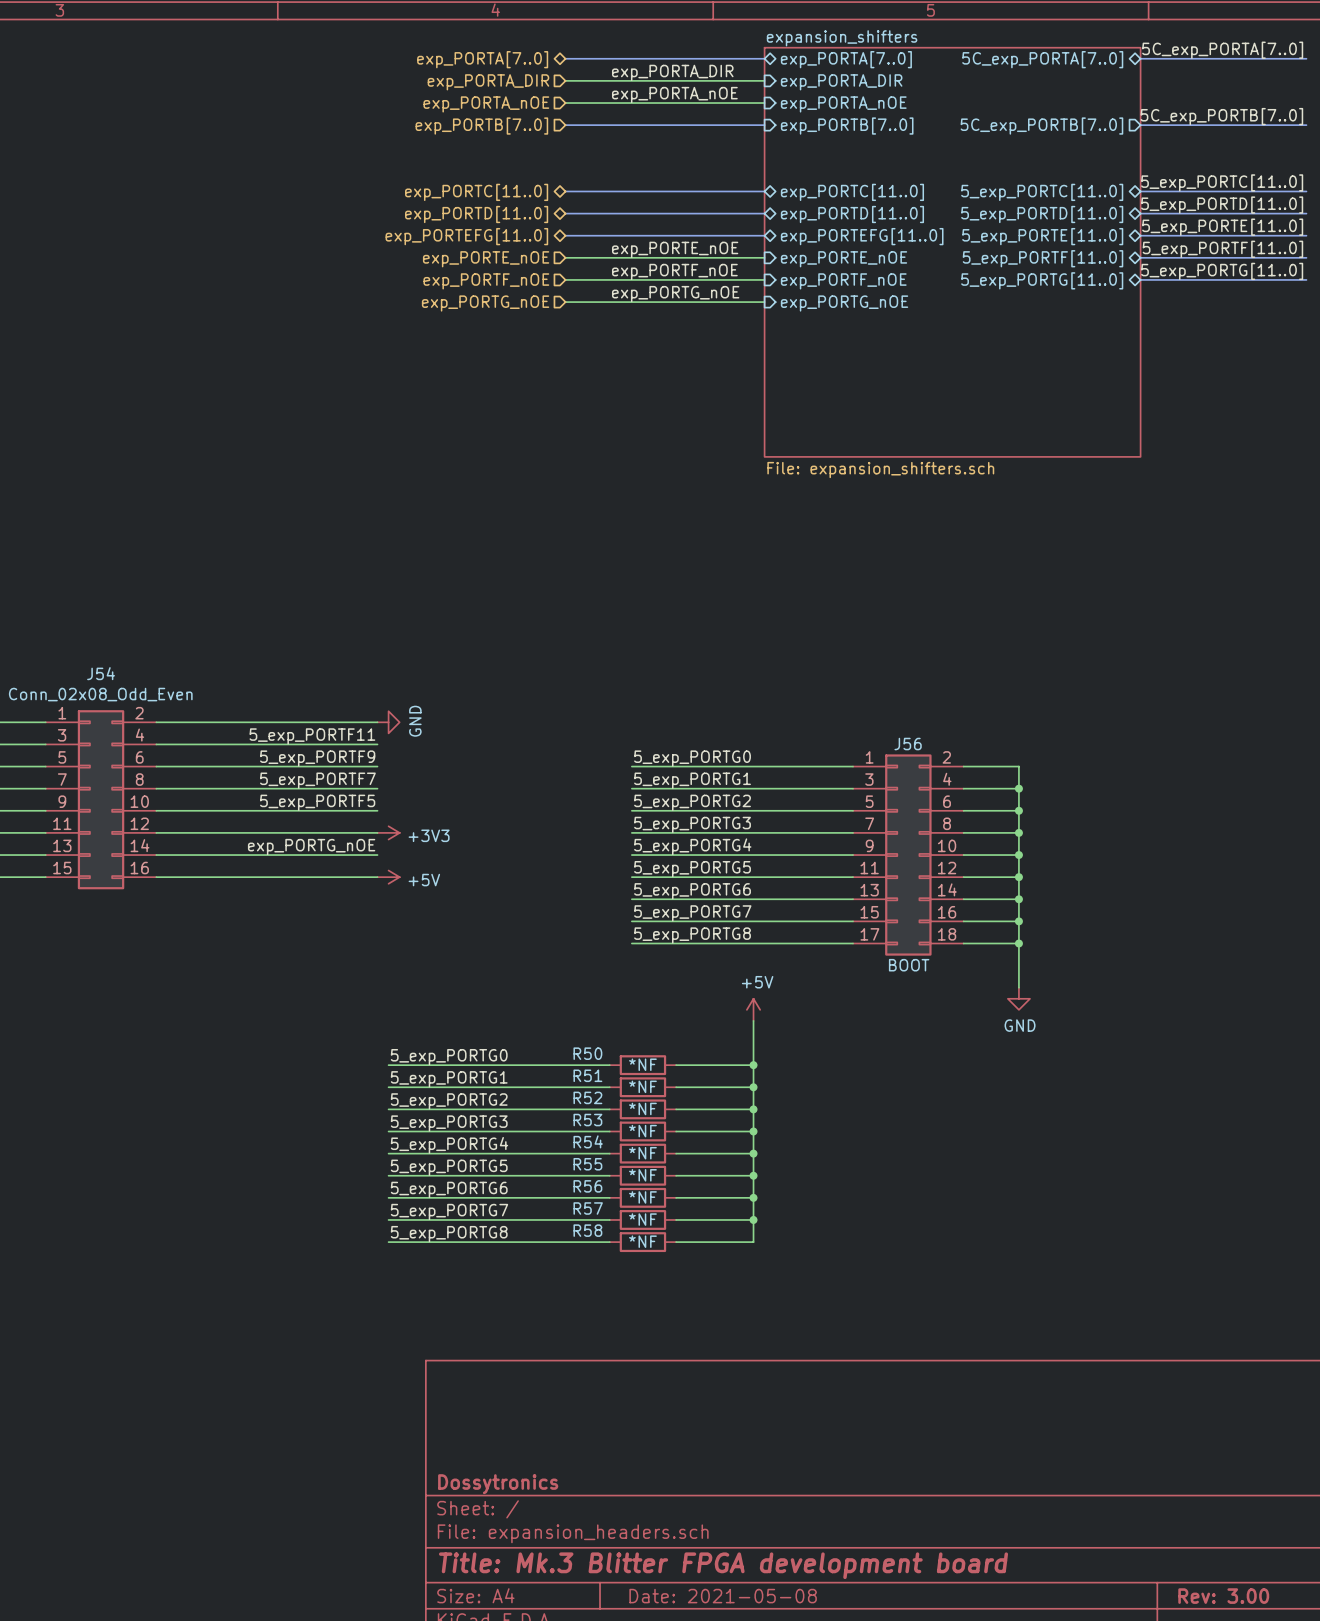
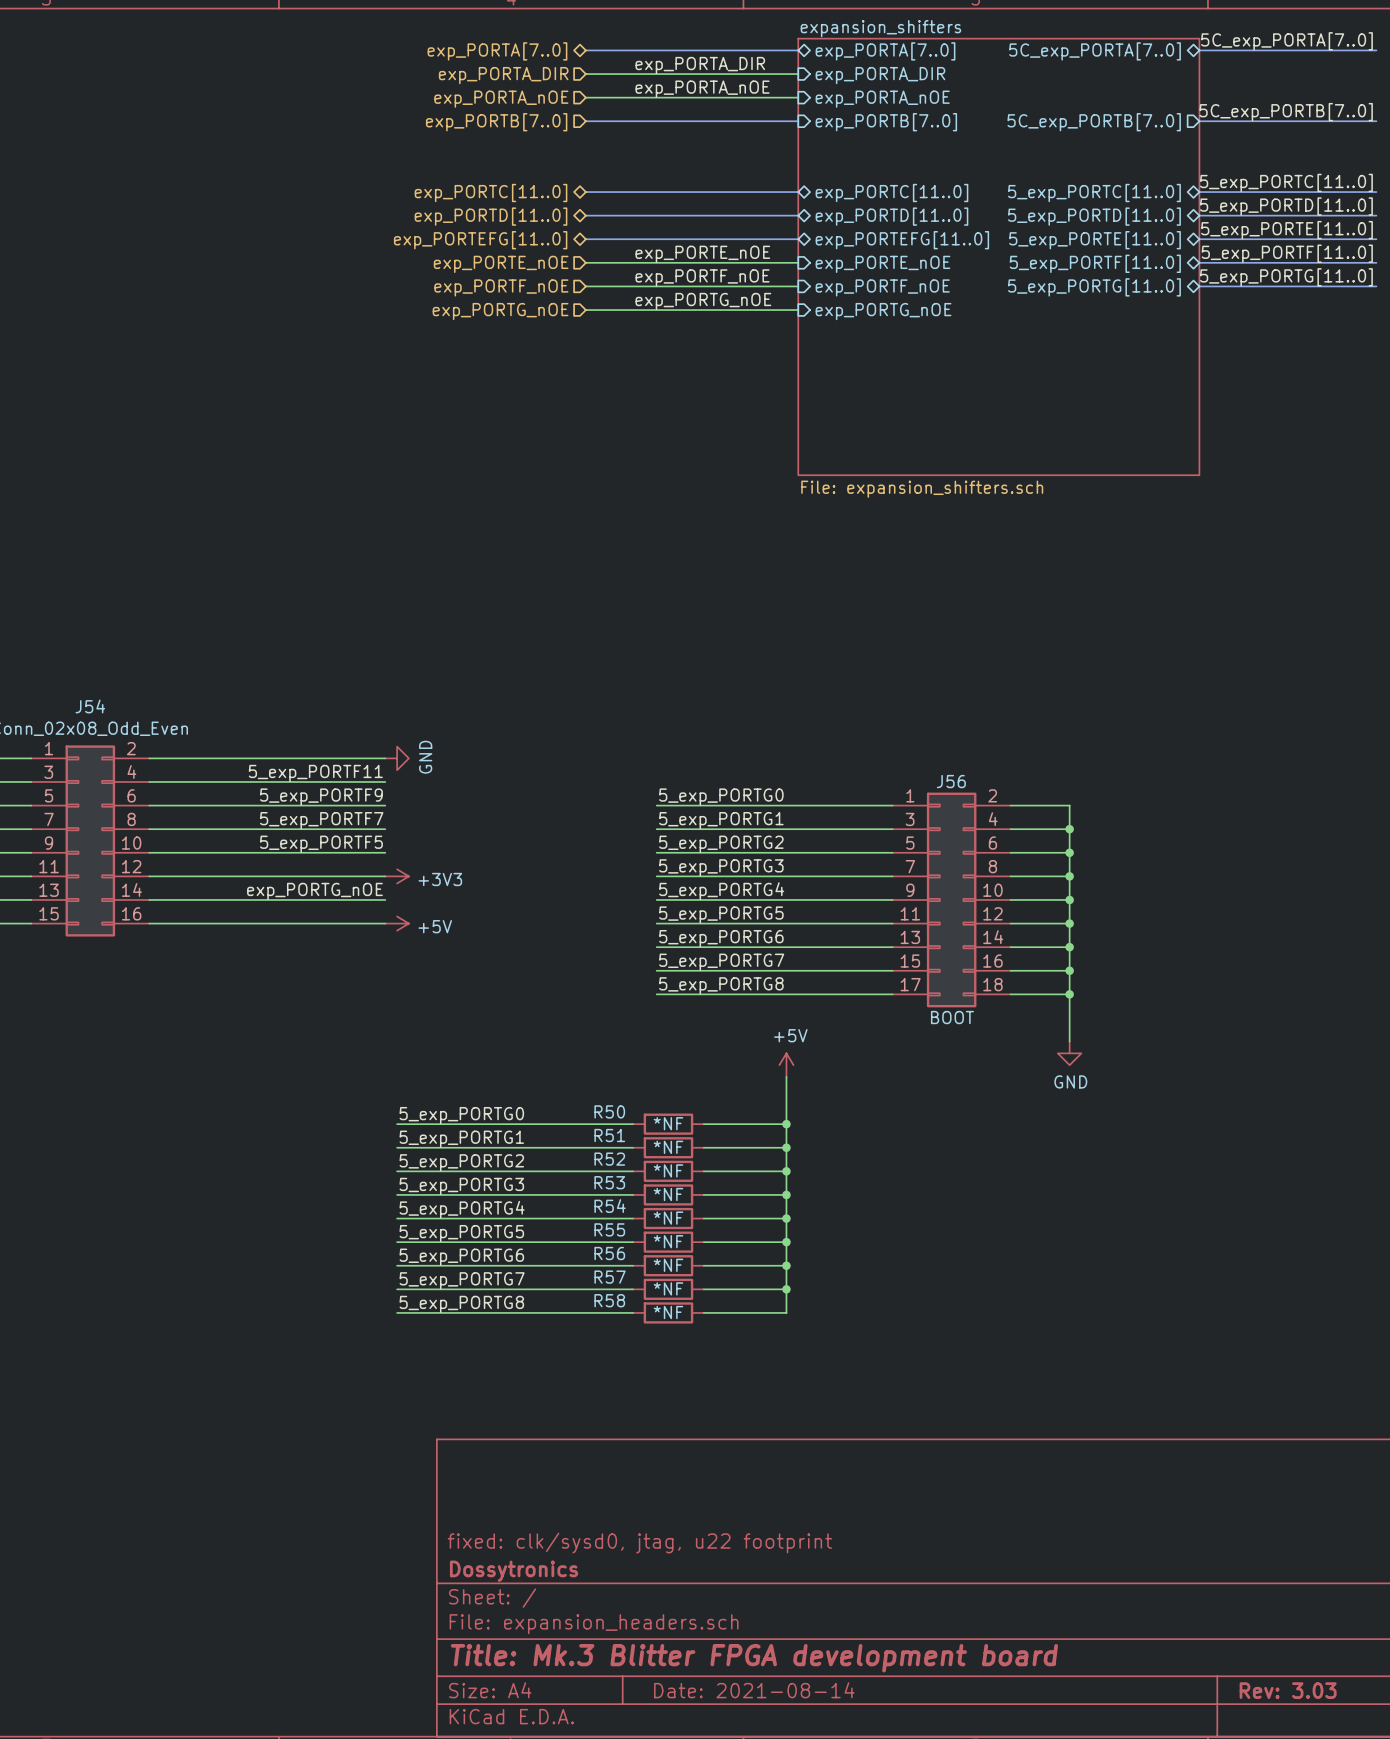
title block: none -> fixed: clk/sysd0, jtag, u22 footprint (639, 1543)
title block: Date: 2021-05-08 (723, 1596) -> Date: 2021-08-14 (754, 1690)
title block: Rev: 3.00 (1223, 1596) -> Rev: 3.03 (1288, 1690)

